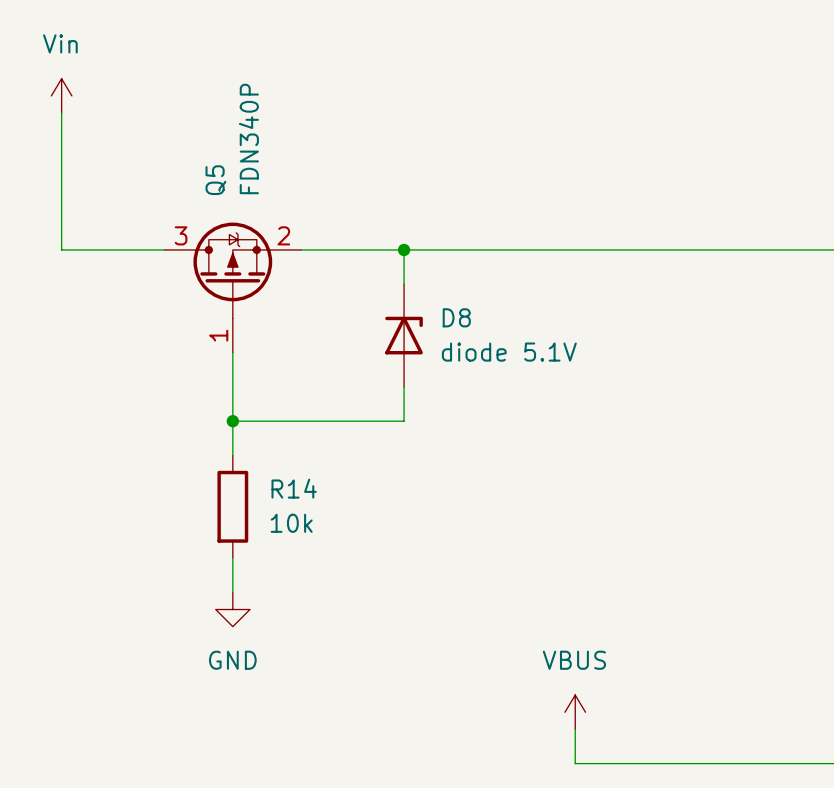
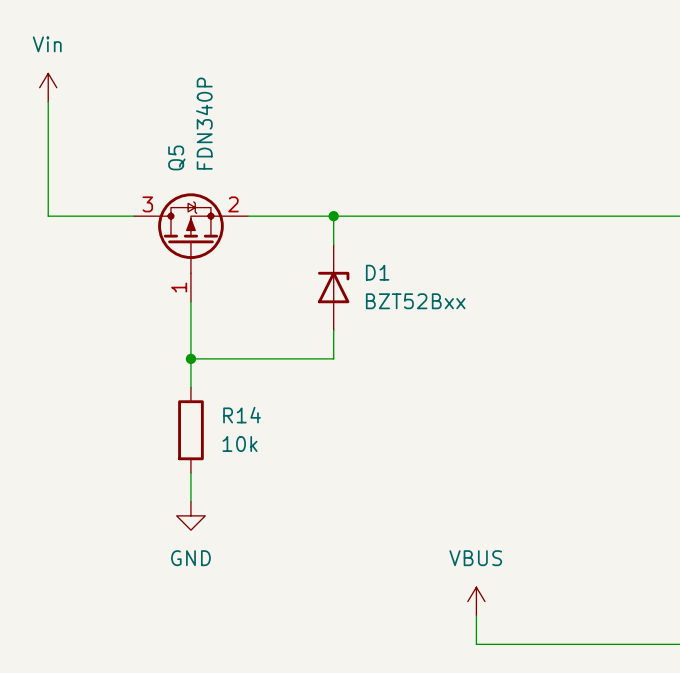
D8 name: D8 (456, 317) -> D1 (377, 272)
D8 value: diode 5.1V (509, 352) -> BZT52Bxx (415, 301)

